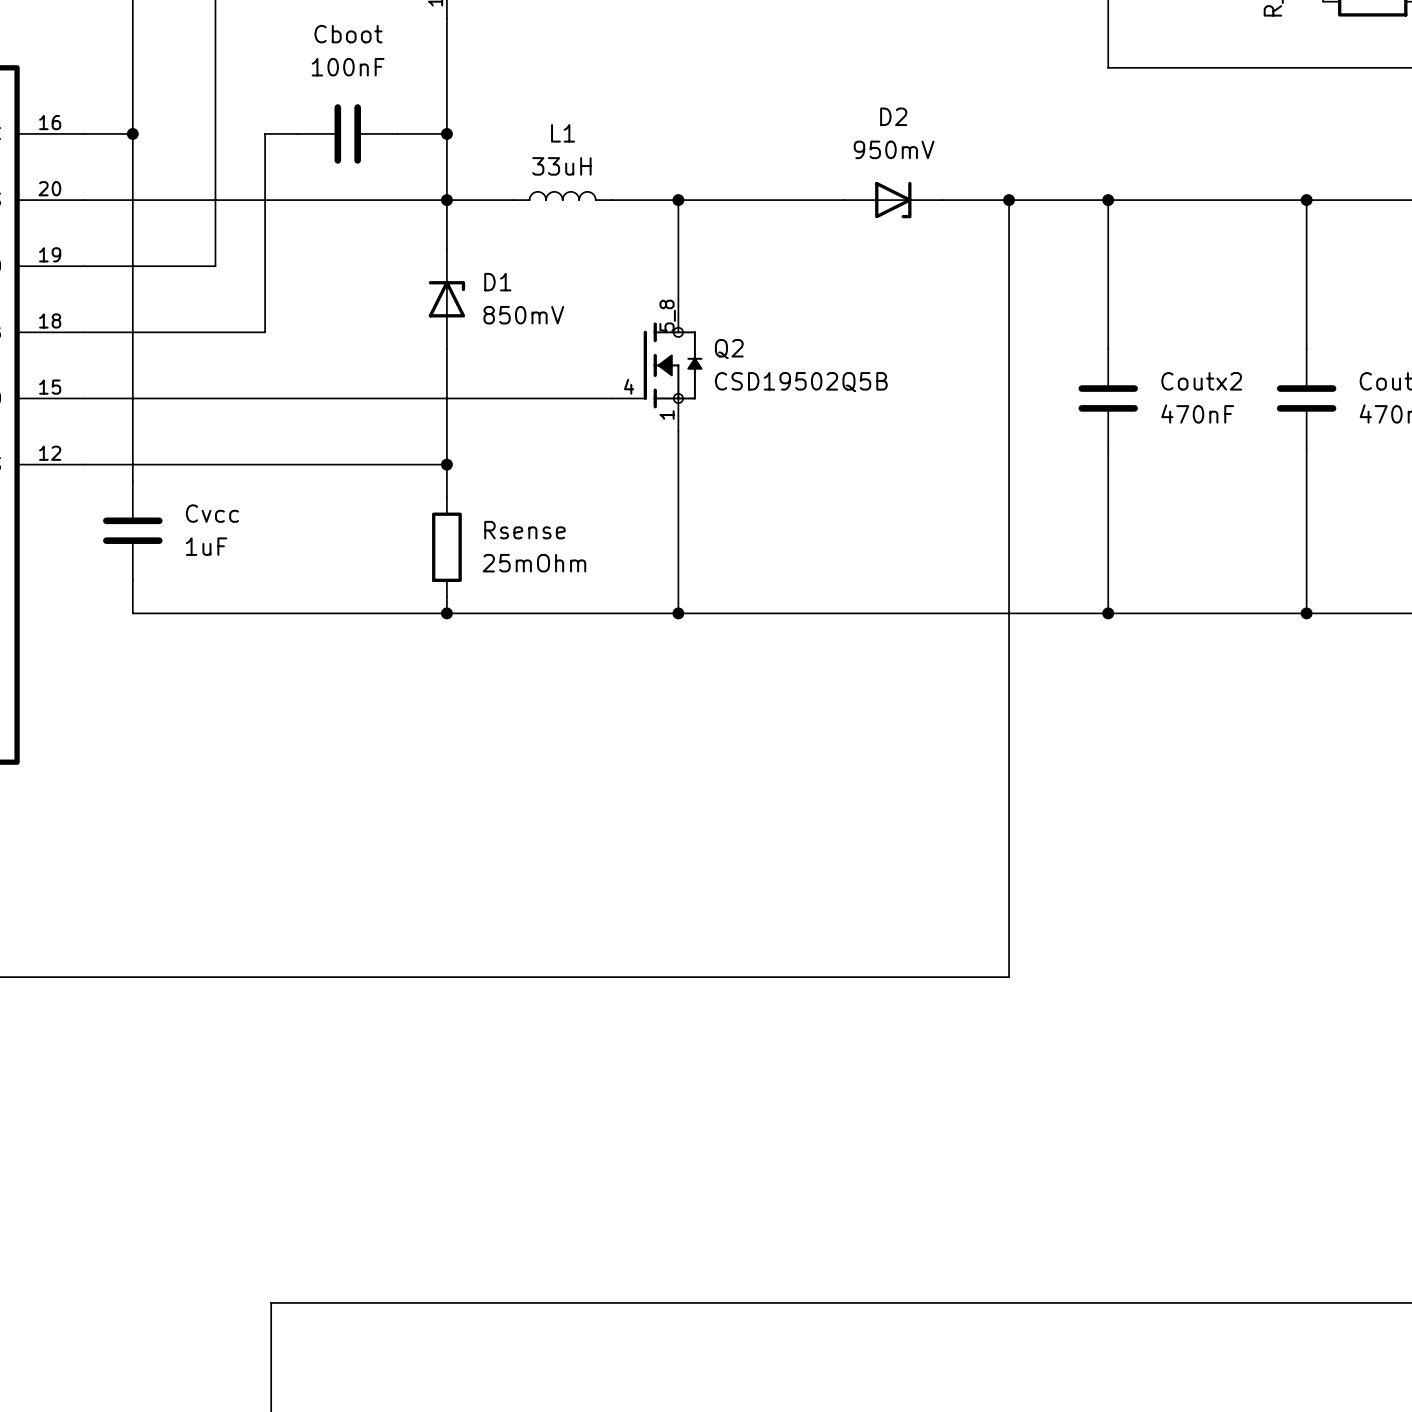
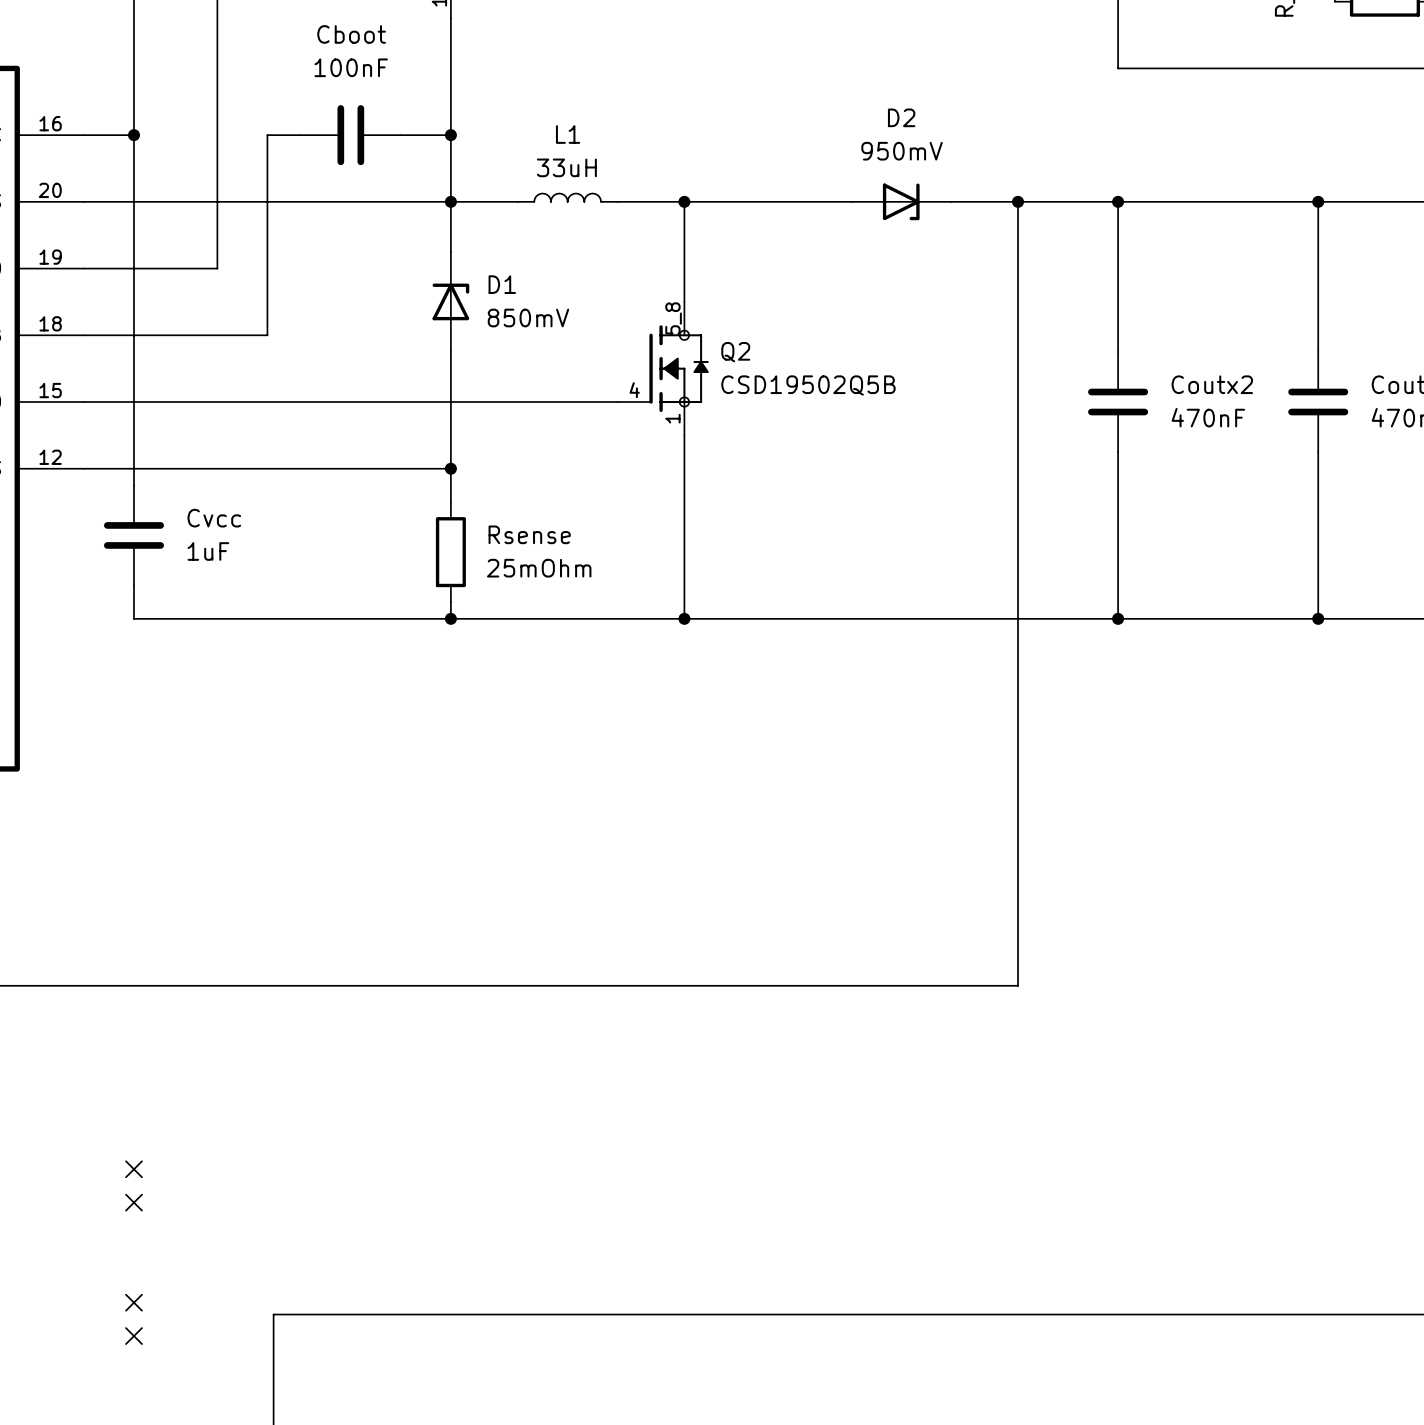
no-connect mark: none -> (134, 1169)
no-connect mark: none -> (134, 1202)
no-connect mark: none -> (134, 1302)
no-connect mark: none -> (134, 1336)

